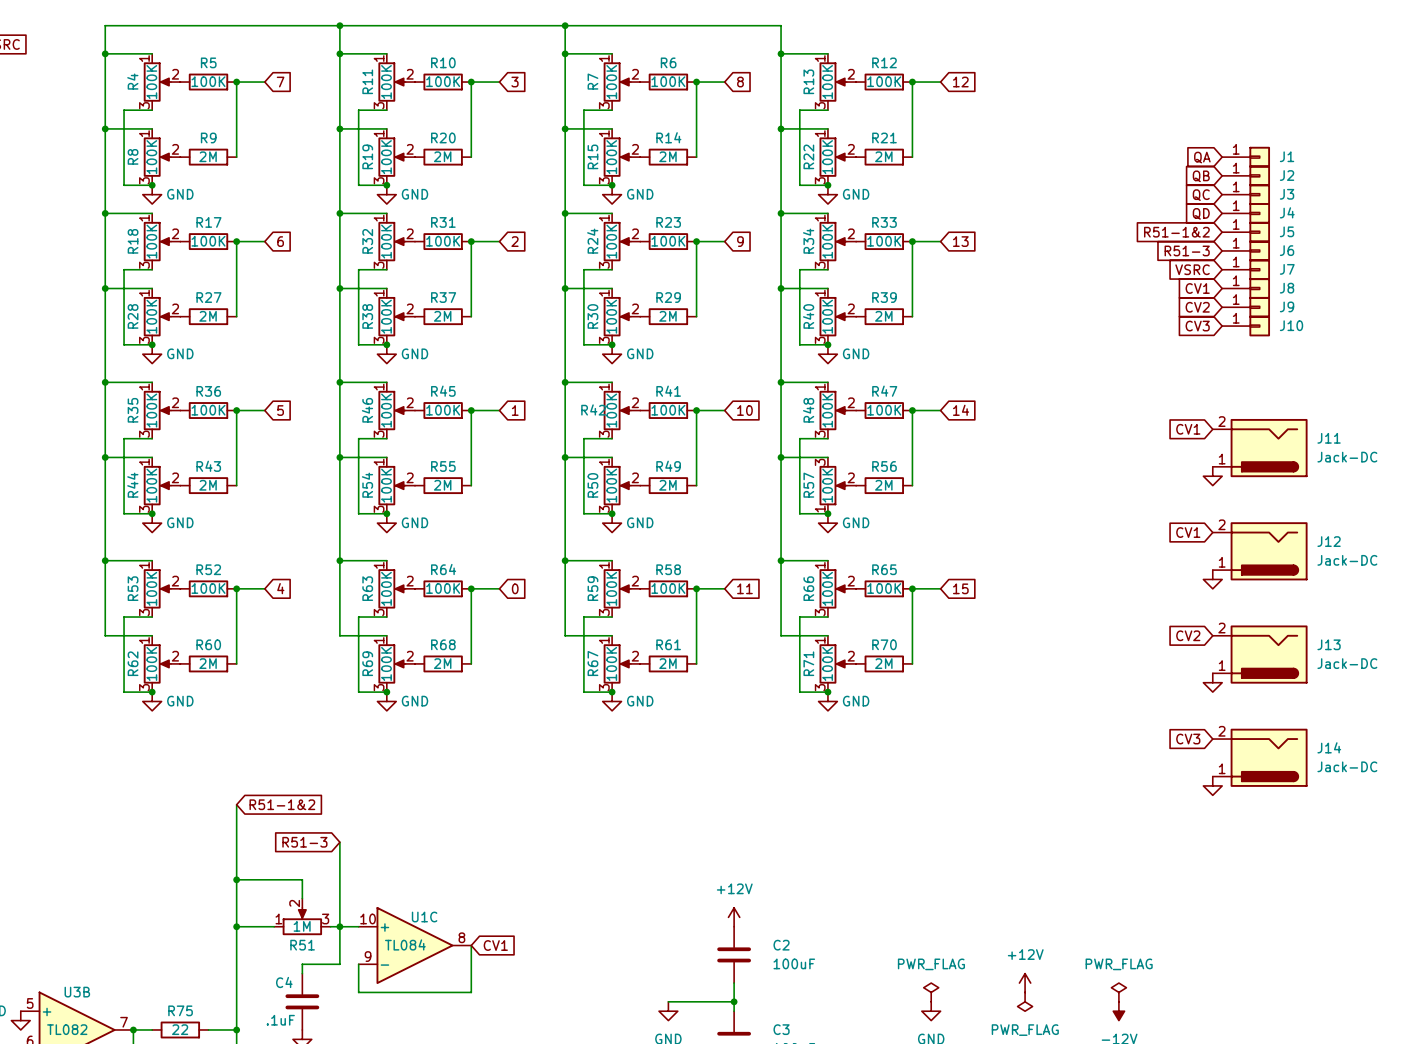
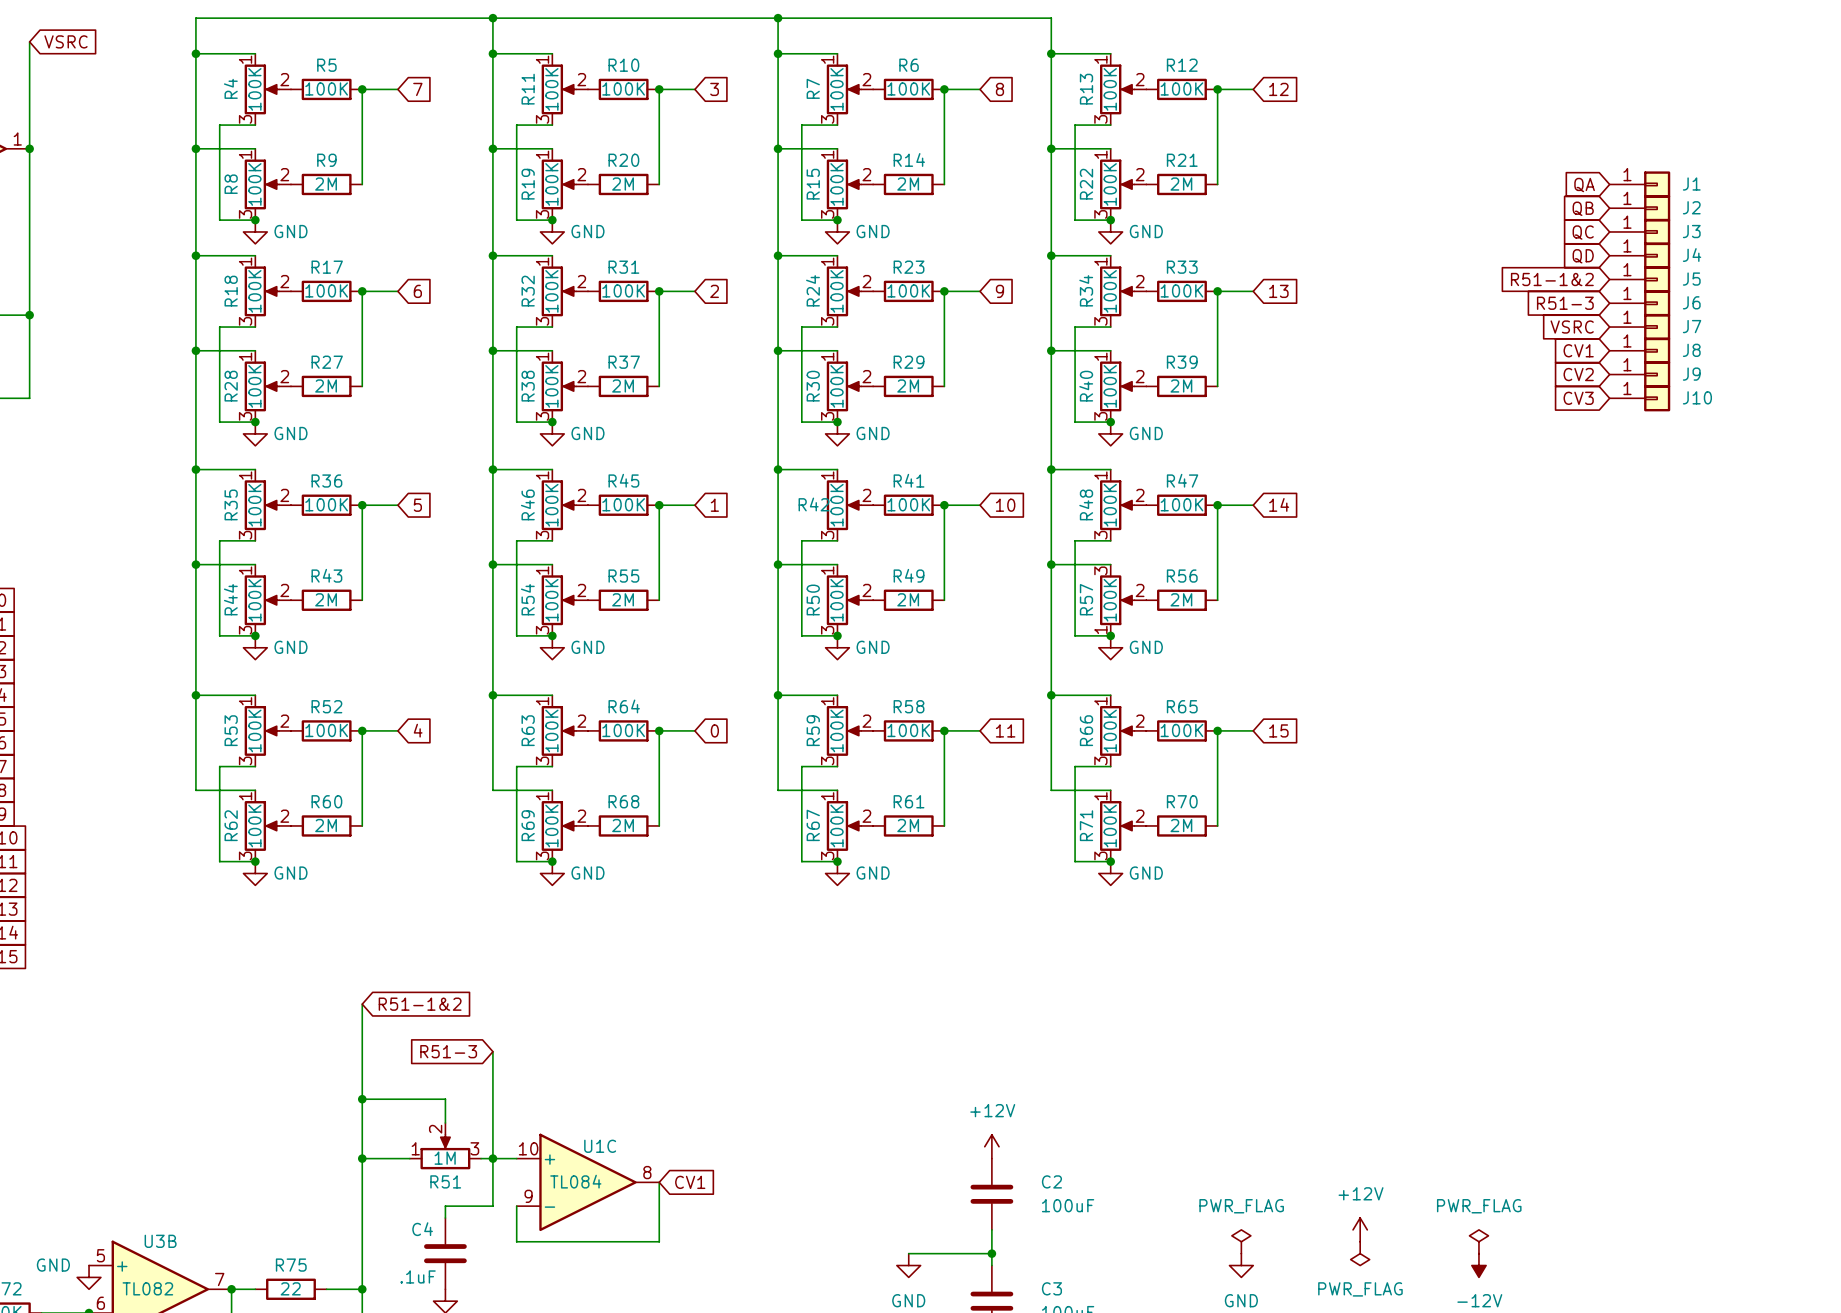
global label: CV1 (1188, 429) -> none
J11: Jack-DC (1260, 448) -> none
power symbol: (1212, 476) -> none
global label: CV1 (1188, 532) -> none
J12: Jack-DC (1260, 551) -> none
power symbol: (1212, 579) -> none
global label: CV2 (1188, 635) -> none
J13: Jack-DC (1260, 654) -> none
power symbol: (1212, 682) -> none
global label: CV3 (1188, 739) -> none
J14: Jack-DC (1260, 757) -> none
power symbol: (1212, 785) -> none

